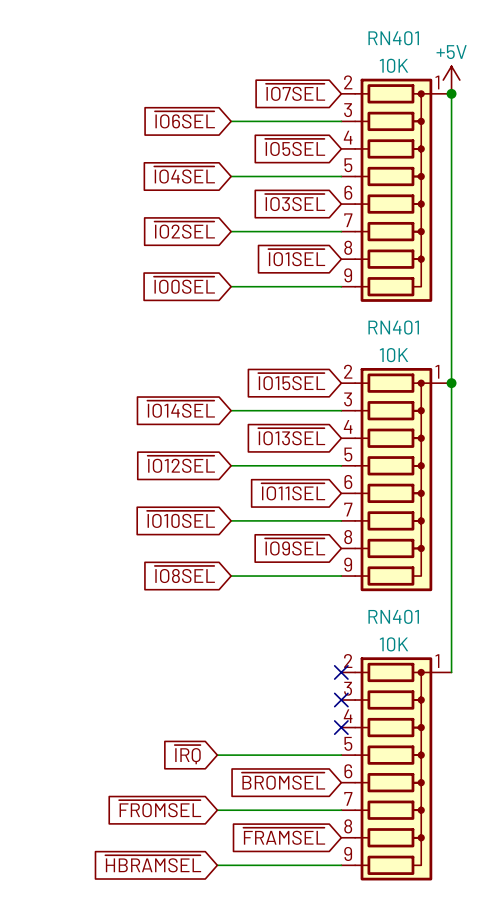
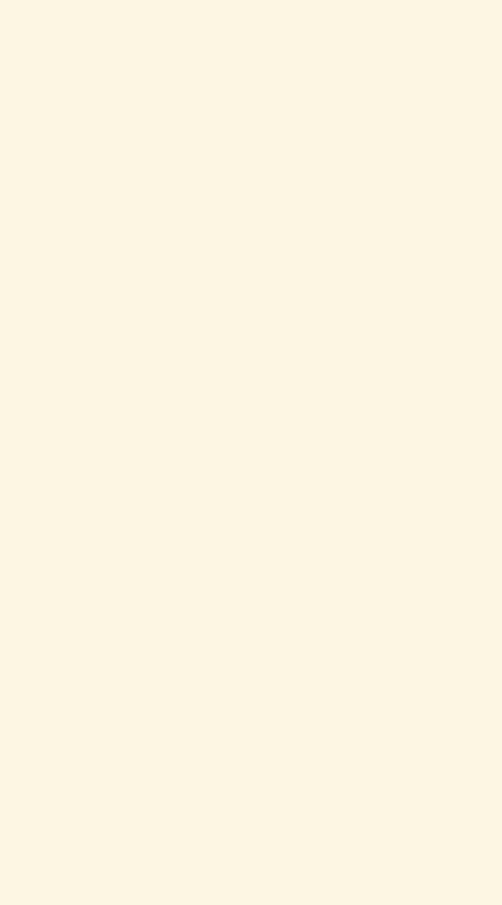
power symbol: +5V (451, 80) -> none
global label: ~{IO7SEL} (295, 92) -> none
wire: (451, 93) (451, 672) -> none
junction: (451, 93) -> none
global label: ~{IO6SEL} (184, 119) -> none
wire: (231, 121) (341, 121) -> none
global label: ~{IO5SEL} (295, 147) -> none
global label: ~{IO4SEL} (184, 175) -> none
wire: (231, 176) (341, 176) -> none
RN401: 10K (396, 190) -> none
global label: ~{IO3SEL} (295, 202) -> none
global label: ~{IO2SEL} (184, 230) -> none
wire: (231, 231) (341, 231) -> none
global label: ~{IO1SEL} (296, 257) -> none
global label: ~{IO0SEL} (184, 285) -> none
wire: (231, 286) (341, 286) -> none
global label: ~{IO15SEL} (291, 381) -> none
junction: (451, 383) -> none
global label: ~{IO14SEL} (181, 409) -> none
wire: (231, 410) (341, 410) -> none
global label: ~{IO13SEL} (291, 436) -> none
global label: ~{IO12SEL} (181, 464) -> none
wire: (231, 465) (341, 465) -> none
RN401: 10K (396, 479) -> none
global label: ~{IO11SEL} (293, 491) -> none
global label: ~{IO10SEL} (181, 519) -> none
wire: (231, 520) (341, 520) -> none
global label: ~{IO9SEL} (295, 546) -> none
global label: ~{IO8SEL} (184, 574) -> none
wire: (231, 576) (341, 576) -> none
no-connect mark: (341, 672) -> none
no-connect mark: (341, 700) -> none
no-connect mark: (341, 727) -> none
global label: ~{IRQ} (187, 754) -> none
wire: (217, 755) (341, 755) -> none
RN401: 10K (396, 768) -> none
global label: ~{BROMSEL} (283, 781) -> none
global label: ~{FROMSEL} (160, 808) -> none
wire: (217, 810) (341, 810) -> none
global label: ~{FRAMSEL} (284, 836) -> none
global label: ~{HBRAMSEL} (153, 863) -> none
wire: (217, 865) (341, 865) -> none

